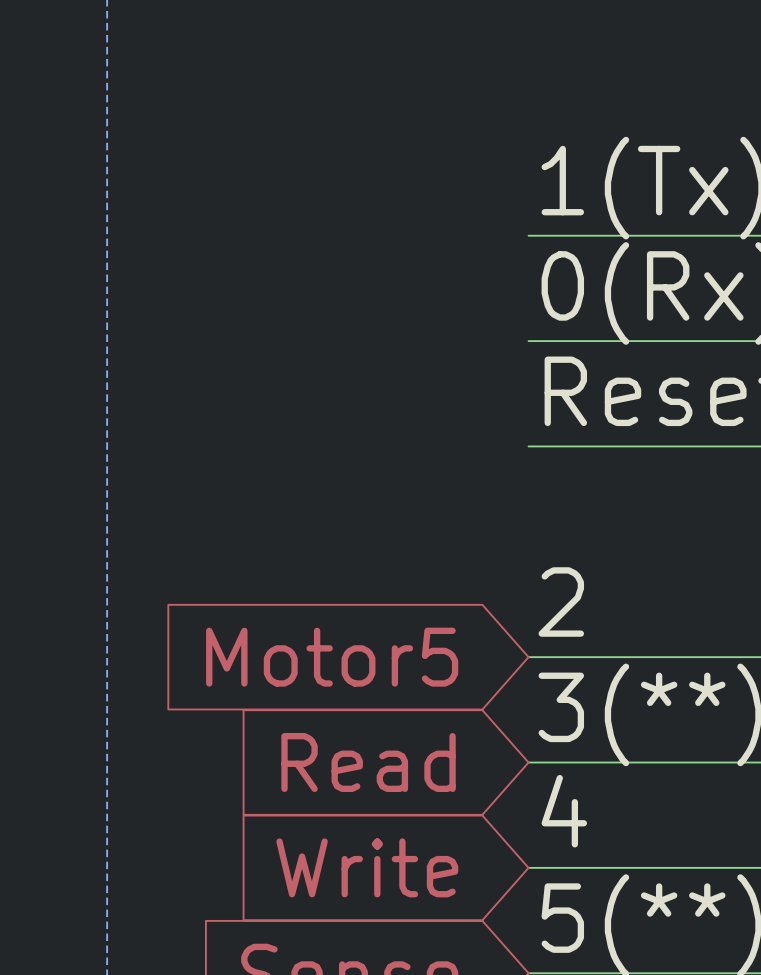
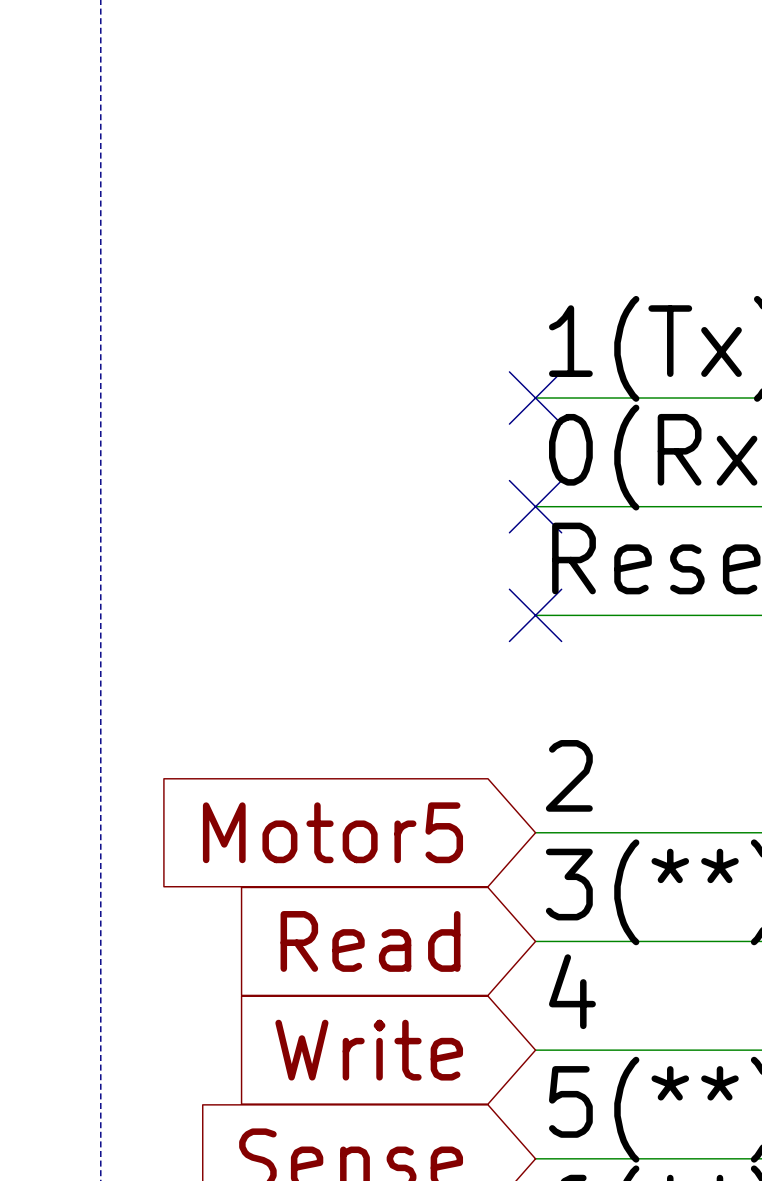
no-connect mark: none -> (535, 398)
no-connect mark: none -> (535, 506)
no-connect mark: none -> (535, 615)

